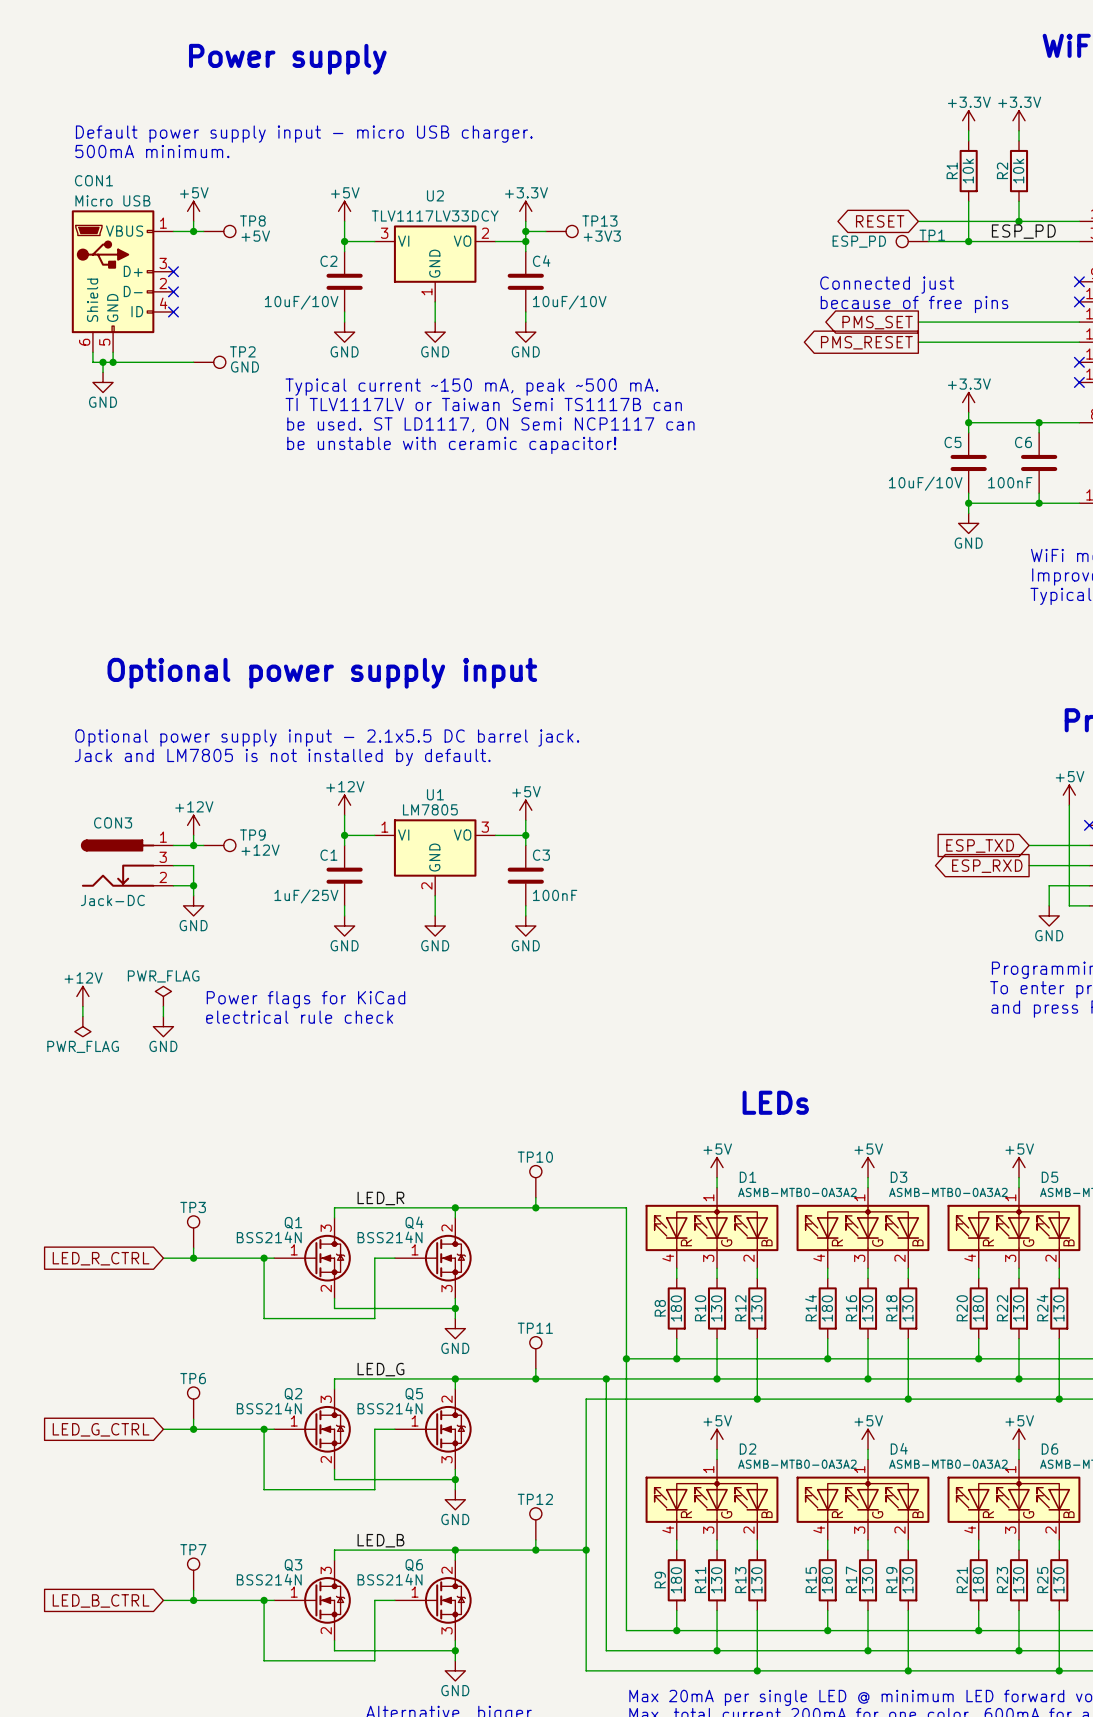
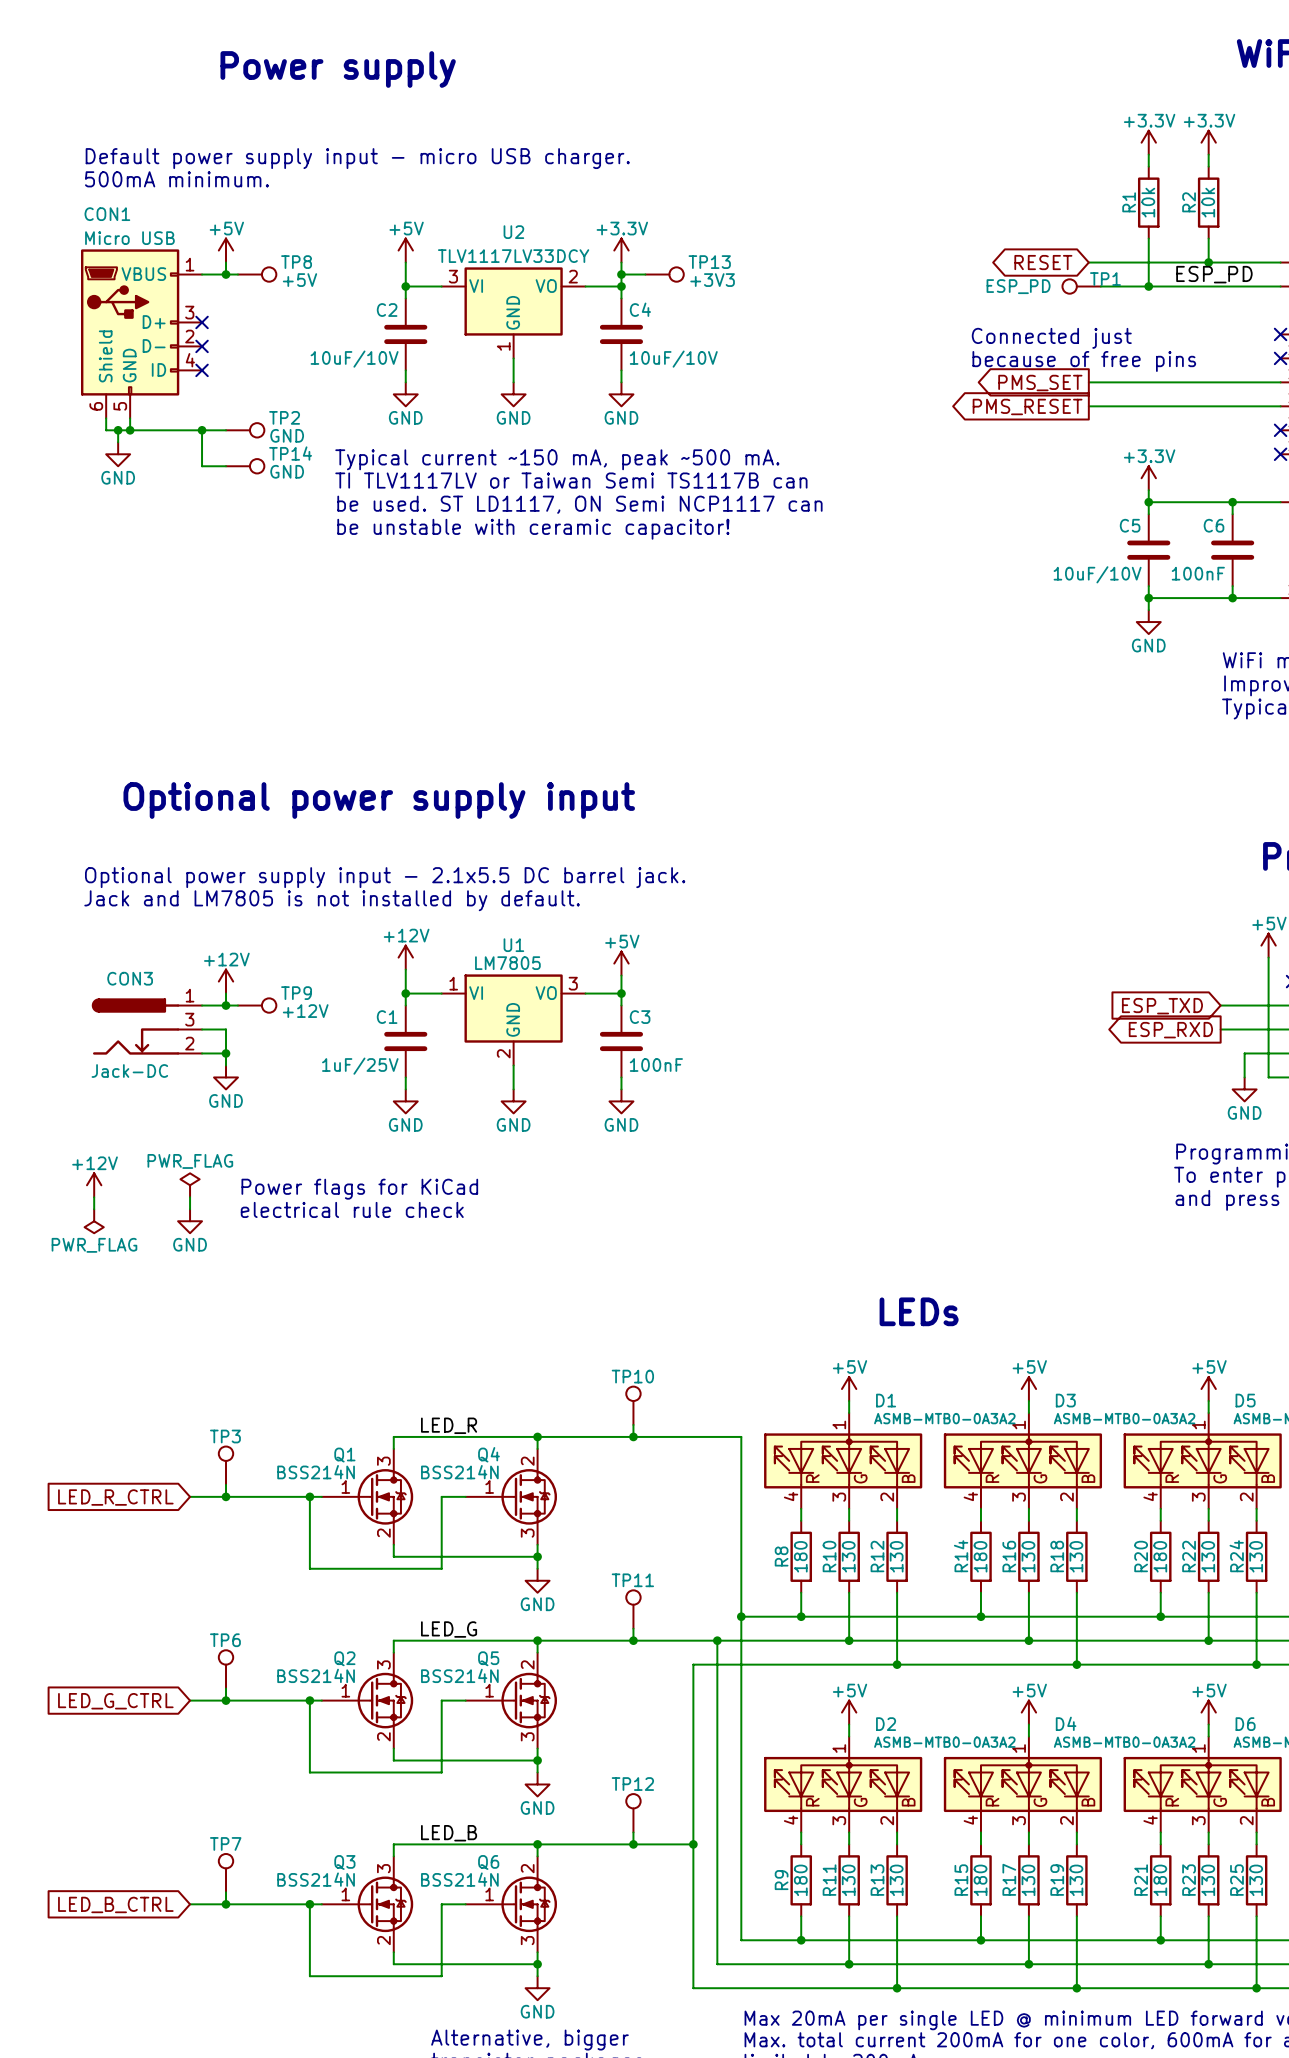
wire: none -> (202, 430) (202, 466) (226, 466)
junction: none -> (202, 430)
TP14: none -> GND (245, 466)

